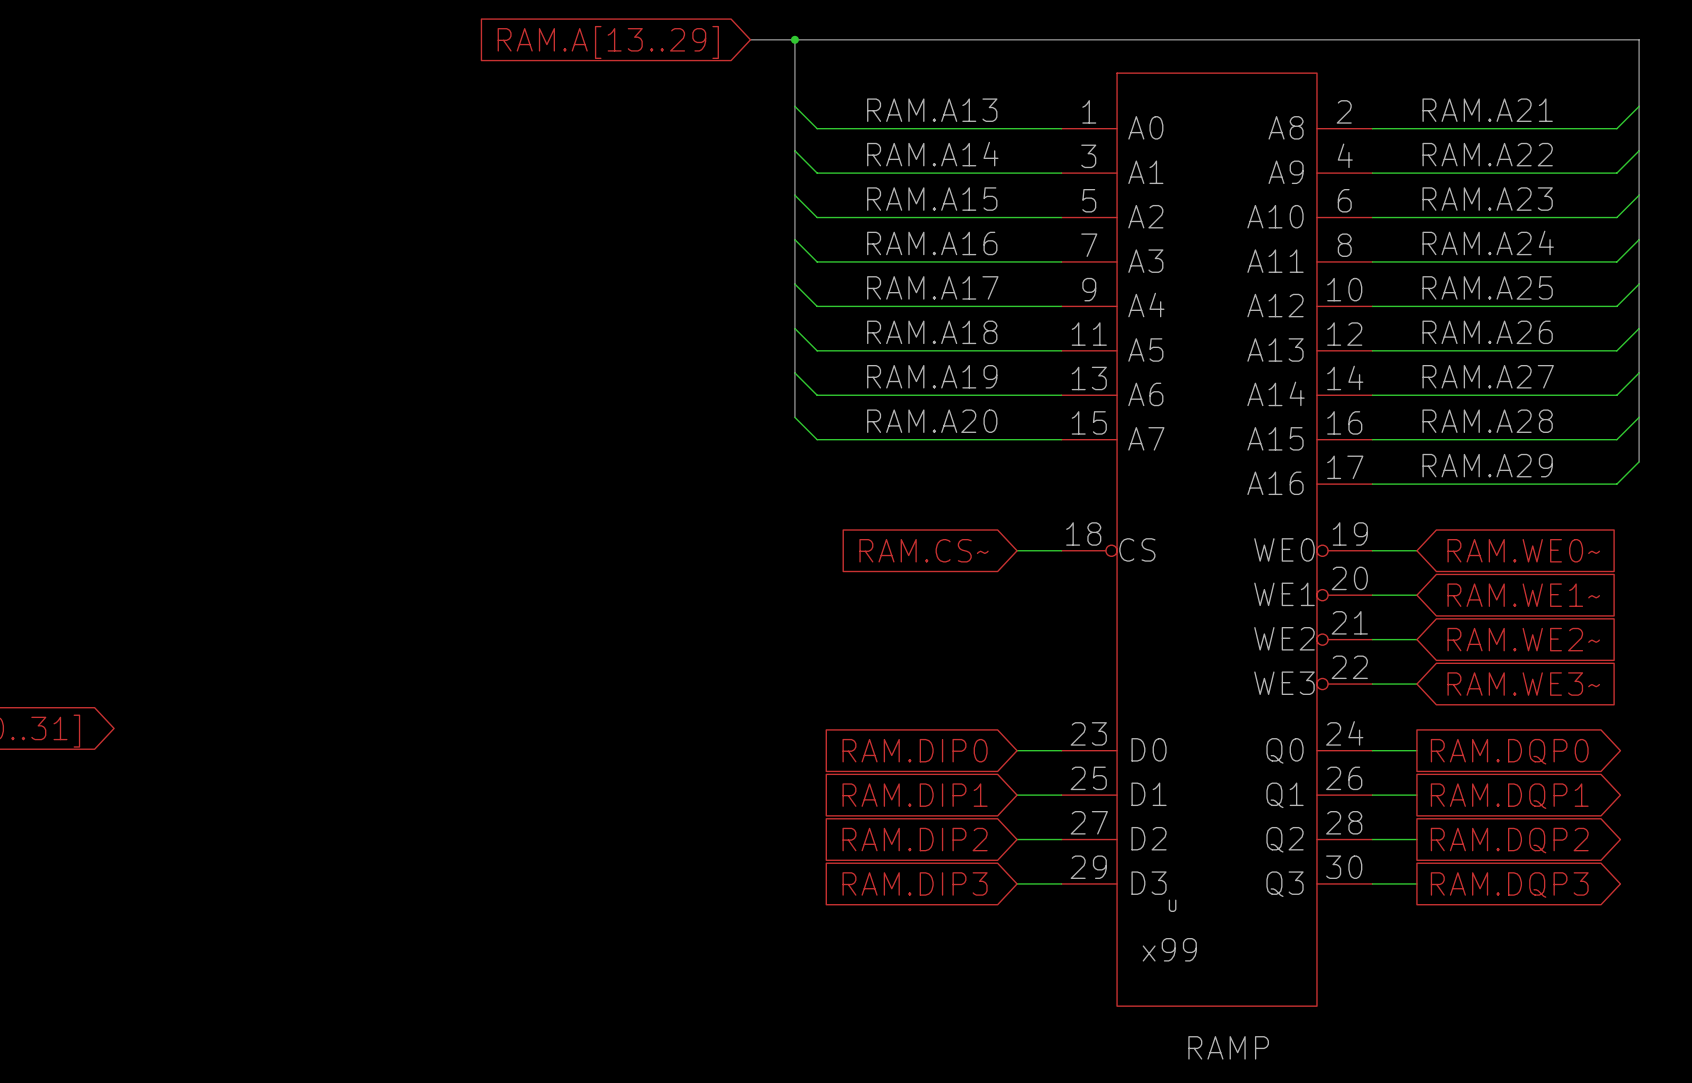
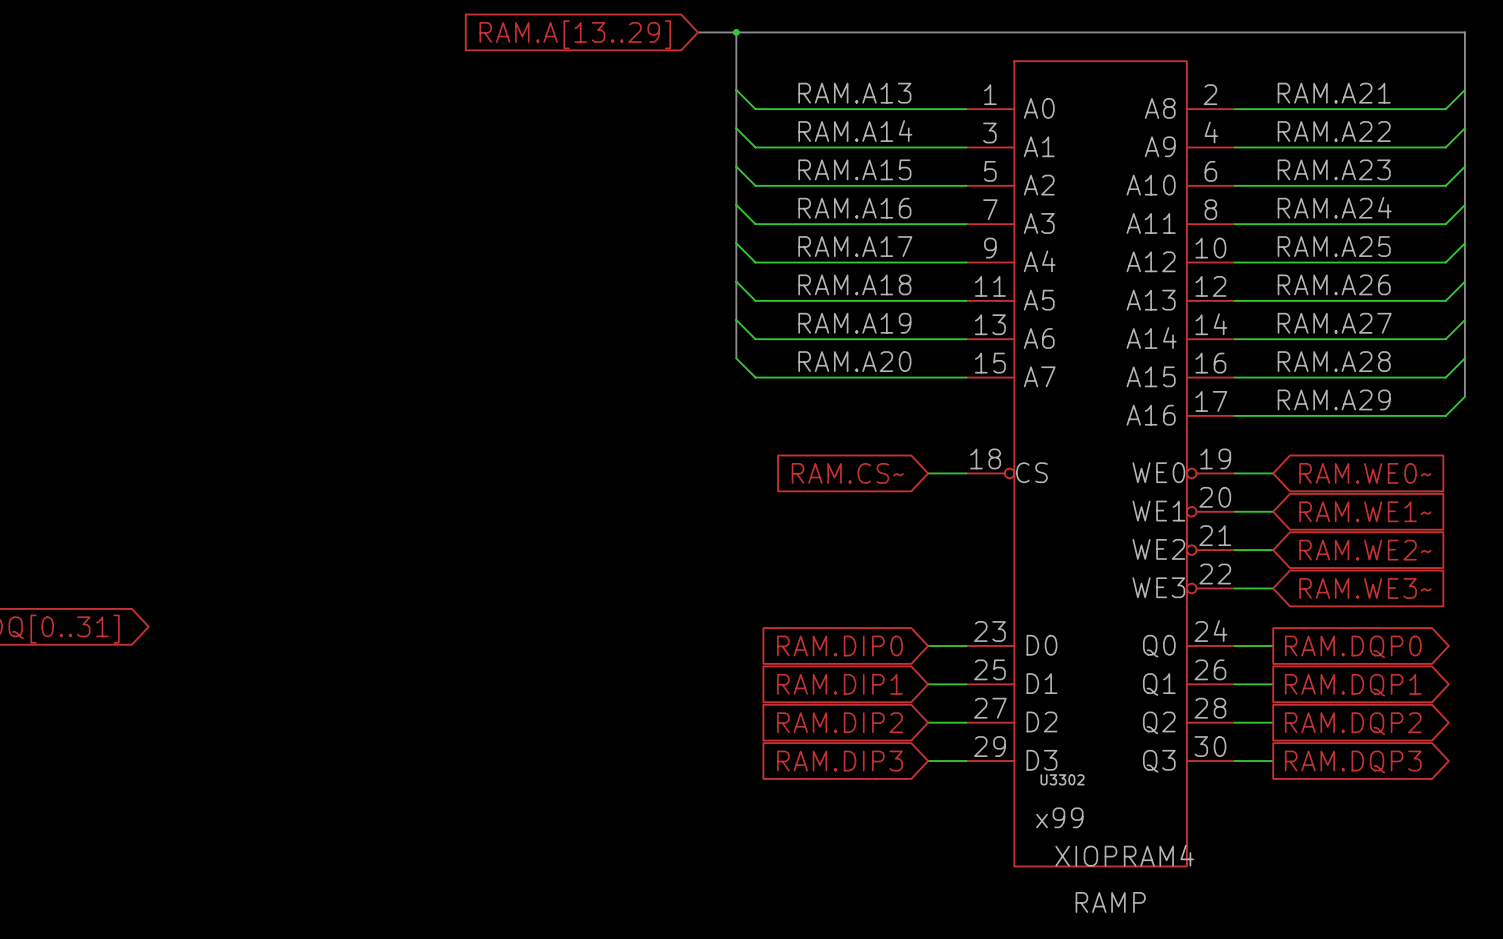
U name: U (1172, 905) -> U3302 (1062, 779)
U value: none -> XIOPRAM4 (1124, 855)

